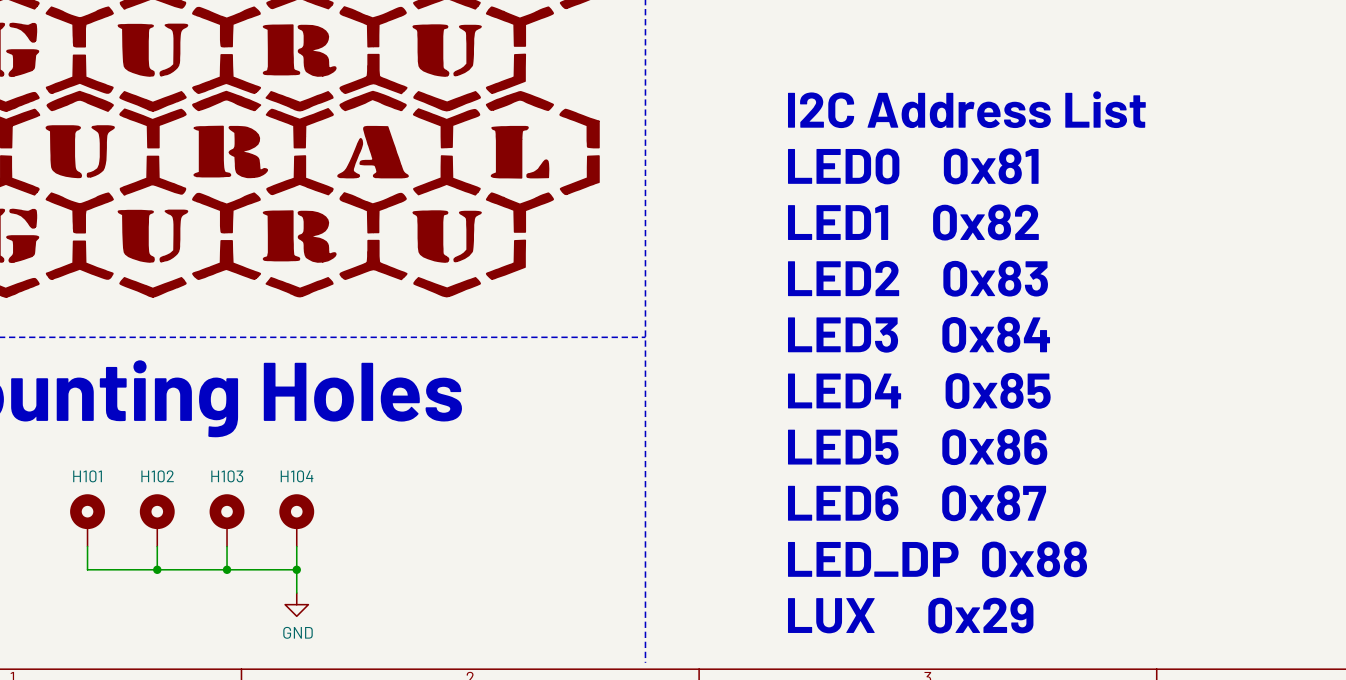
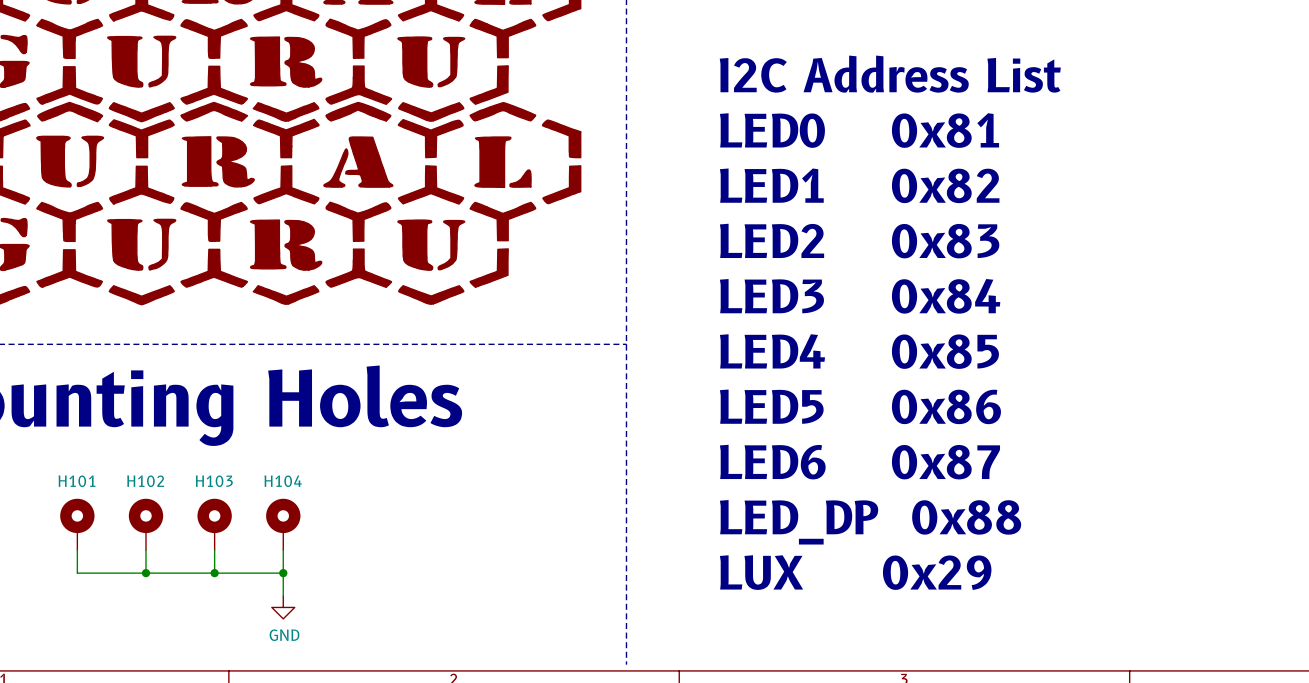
text position: I2C Address List (966, 109) -> I2C Address List (890, 74)
text position: LED0 0x81 (913, 166) -> LED0 0x81 (859, 130)
text position: LED1 0x82 (913, 222) -> LED1 0x82 (859, 185)
text position: LED2 0x83 (917, 278) -> LED2 0x83 (859, 241)
text position: LED3 0x84 (919, 334) -> LED3 0x84 (860, 296)
text position: LED4 0x85 (919, 390) -> LED4 0x85 (859, 351)
text position: LED5 0x86 (917, 447) -> LED5 0x86 (860, 406)
text position: LED6 0x87 (917, 503) -> LED6 0x87 (859, 462)
text position: LED_DP 0x88 (937, 559) -> LED_DP 0x88 (870, 522)
text position: LUX 0x29 (910, 615) -> LUX 0x29 (855, 572)

